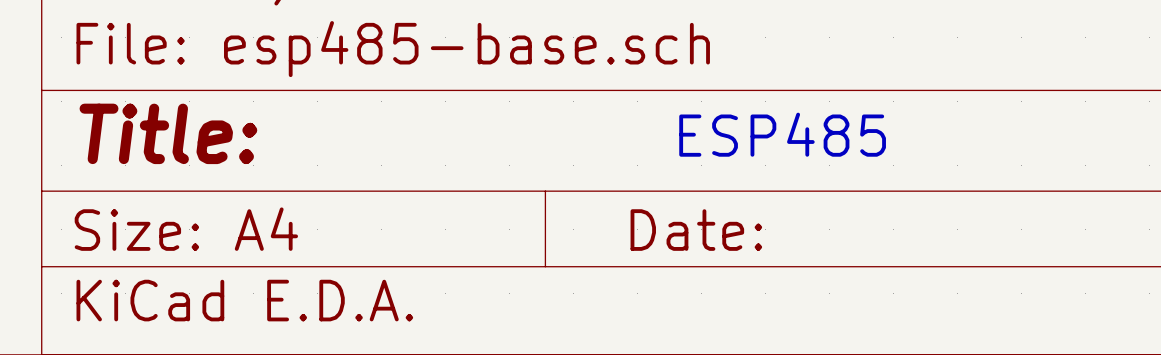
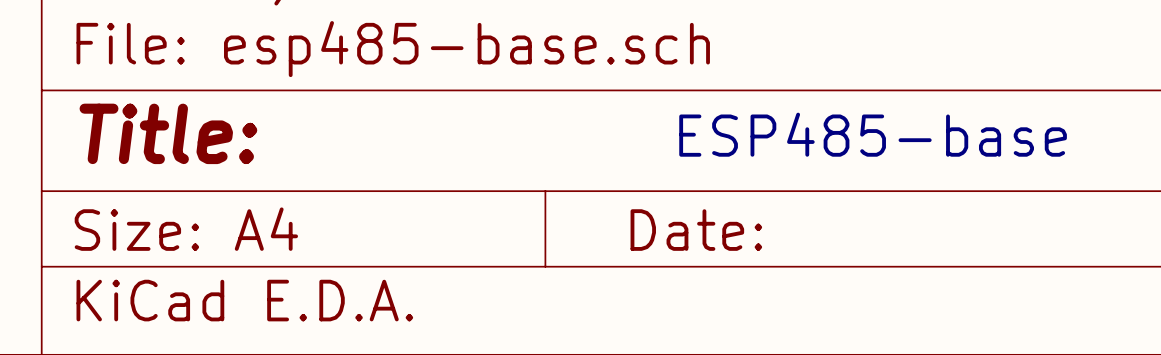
text: ESP485 (782, 134) -> ESP485-base (873, 134)

